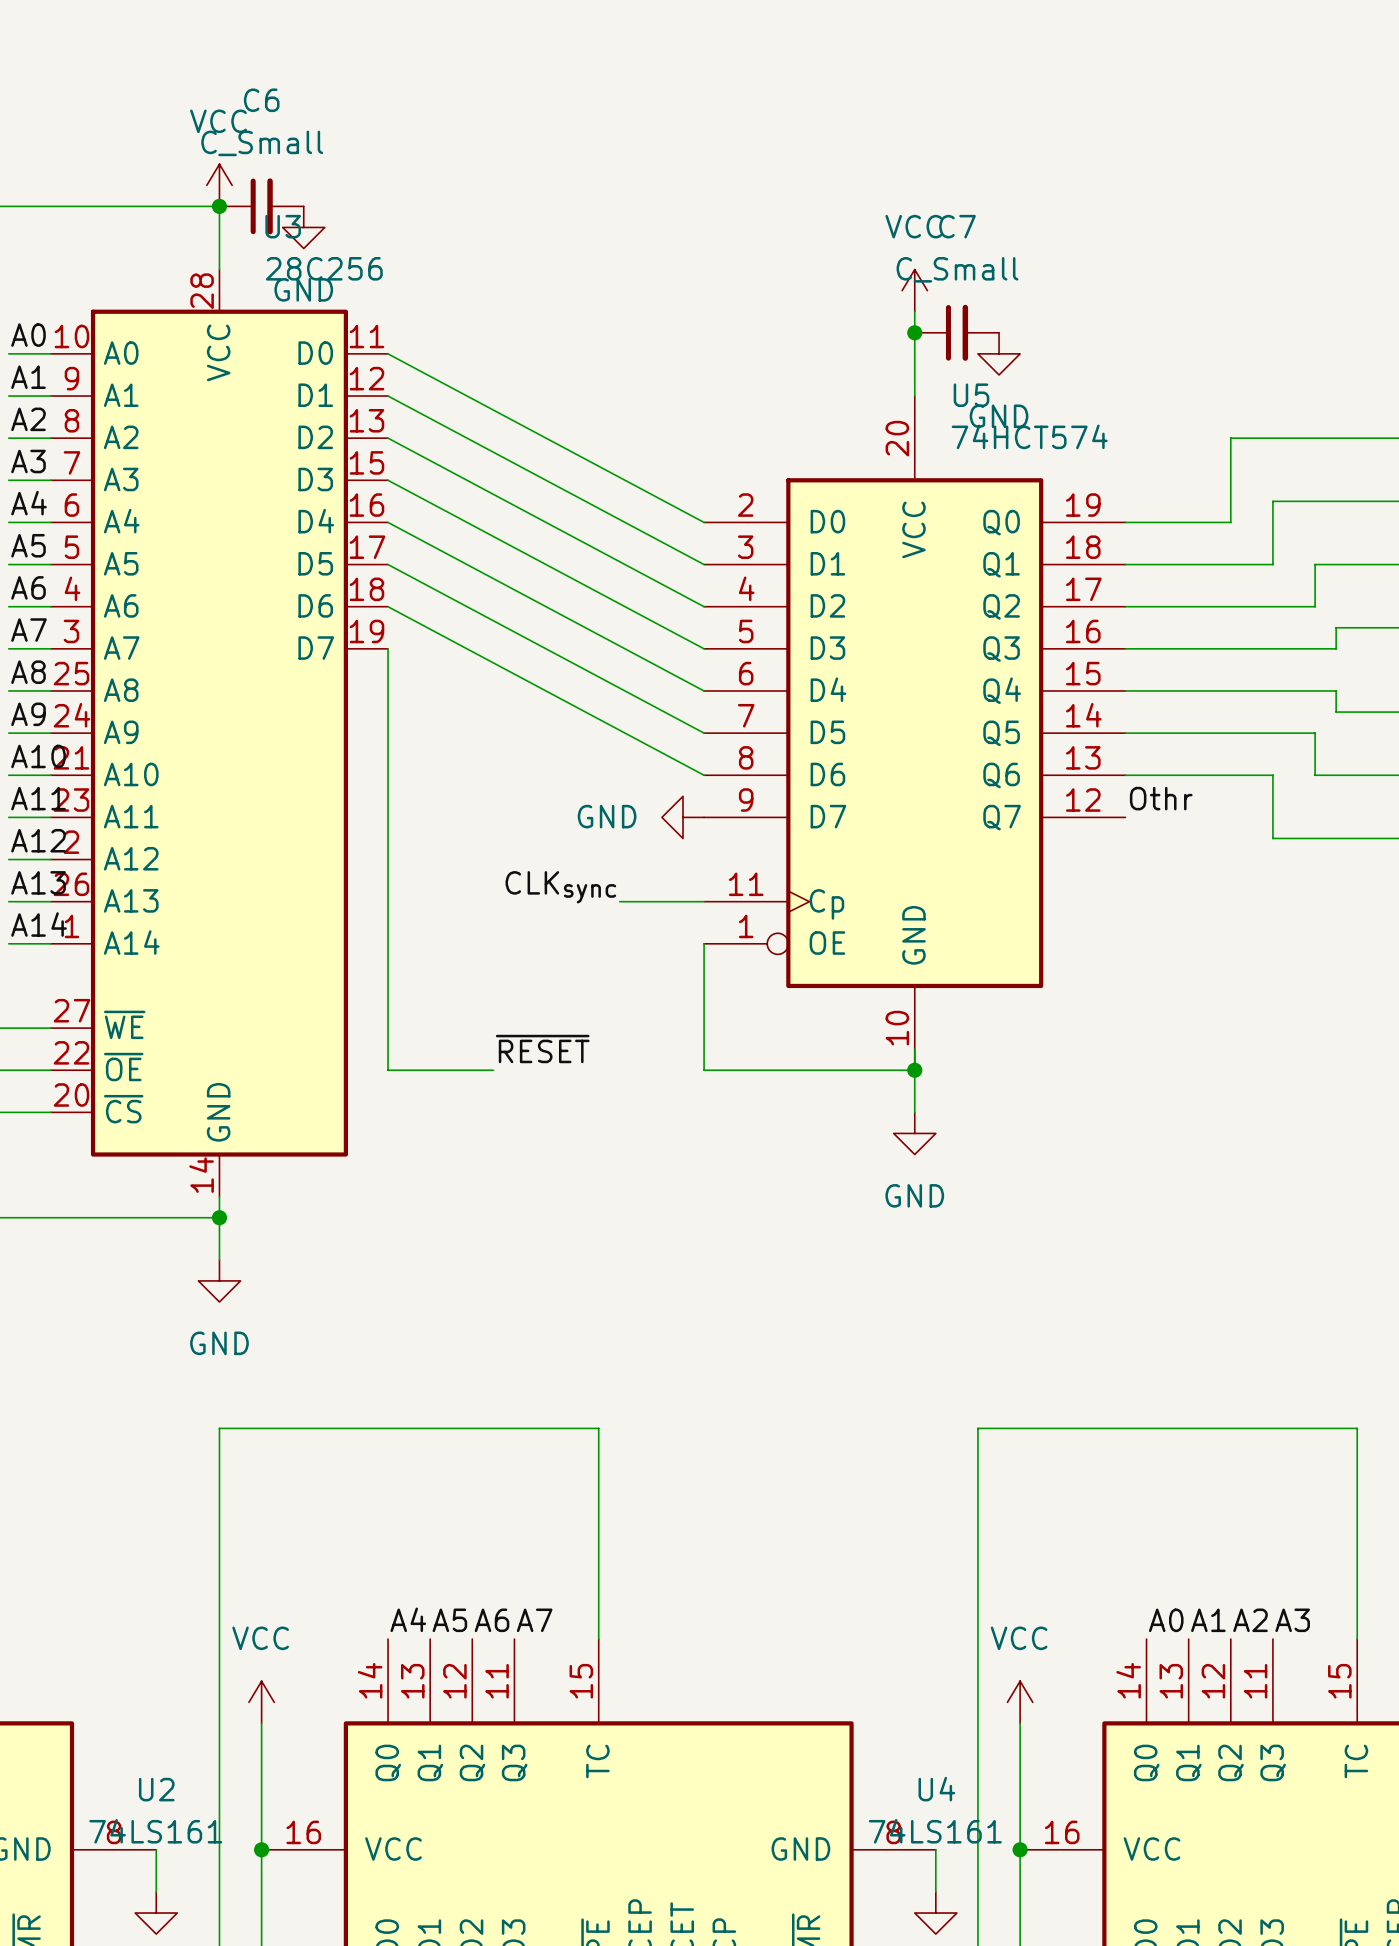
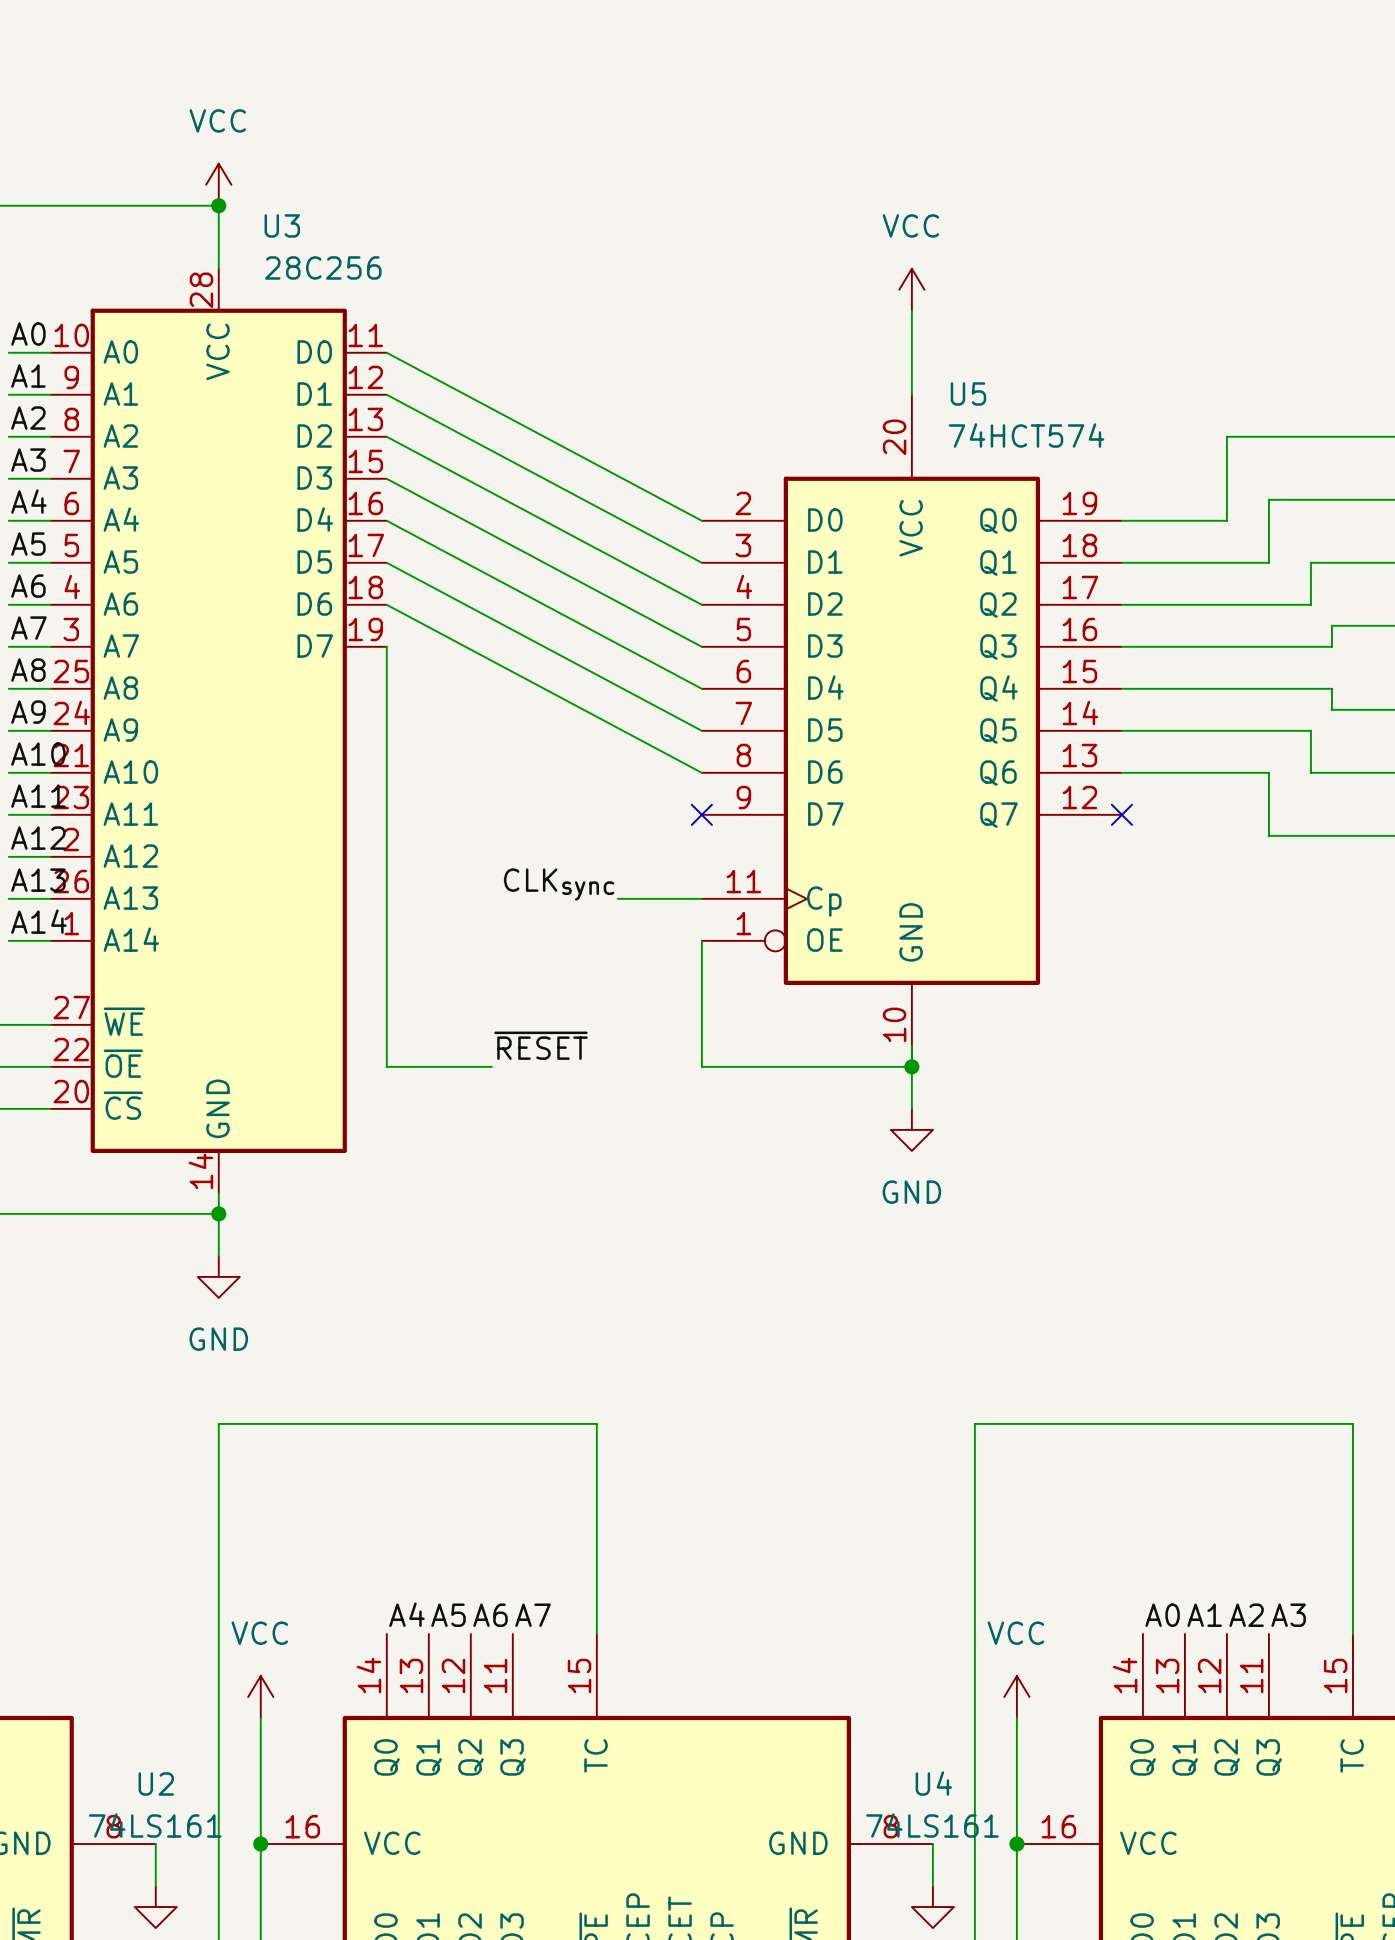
C6: C_Small (261, 206) -> none
power symbol: GND (303, 227) -> none
junction: (914, 332) -> none
C7: C_Small (956, 332) -> none
power symbol: GND (999, 353) -> none
label: Othr (1161, 798) -> none
power symbol: GND (682, 817) -> none
no-connect mark: none -> (701, 814)
no-connect mark: none -> (1121, 814)

